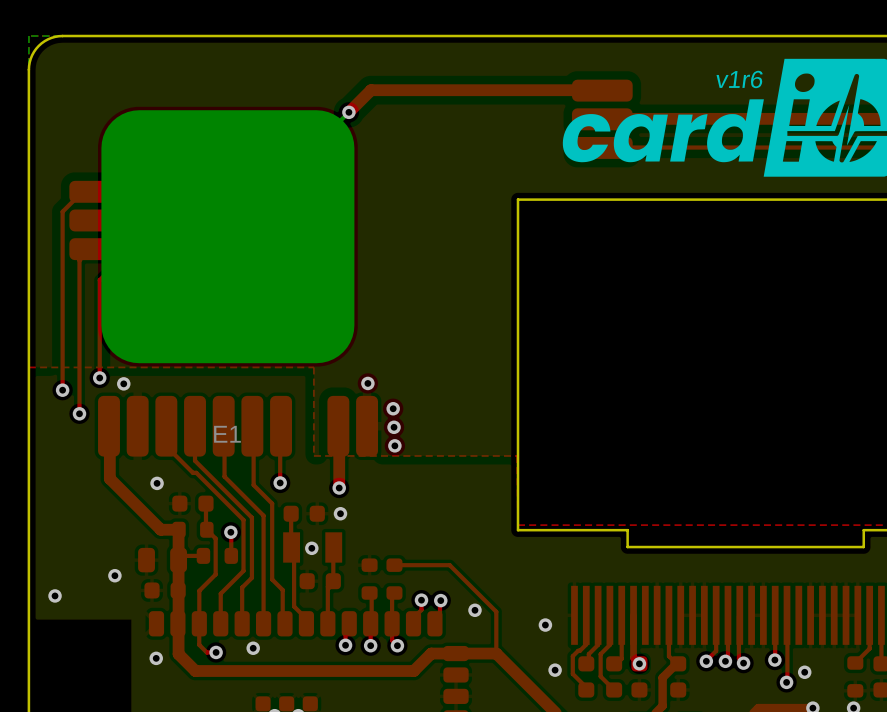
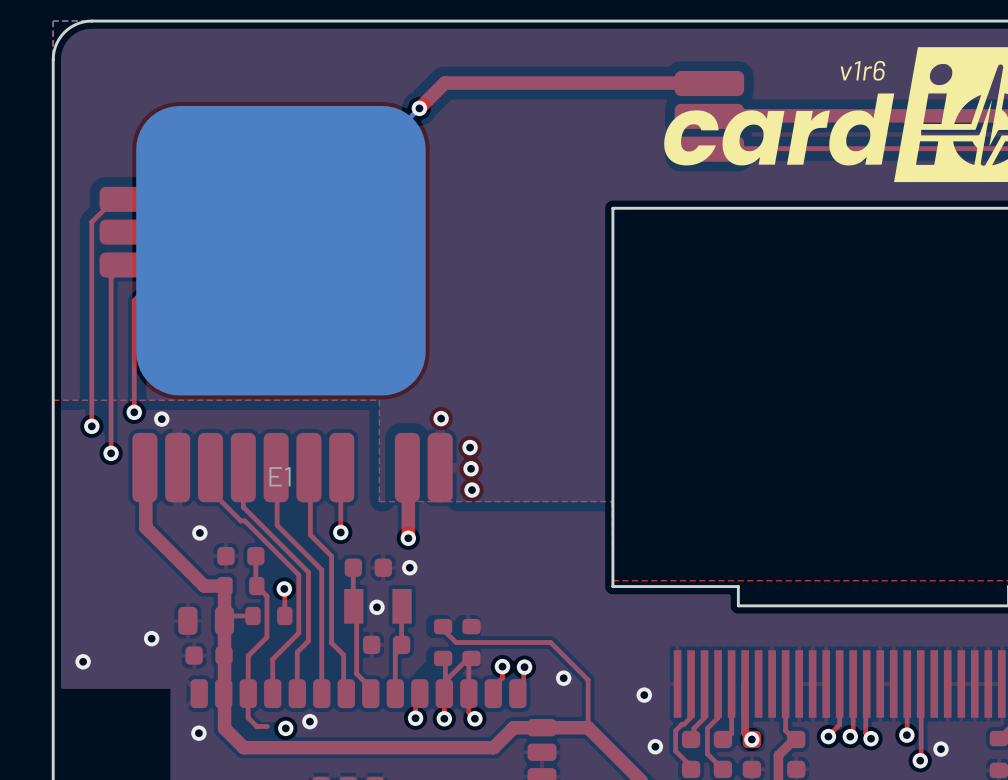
top track: (394, 565) (449, 565) (463, 579) -> (439, 625) (456, 642) (550, 642)
top track: none -> (468, 658) (444, 682)
via position: (216, 652) -> (285, 728)

